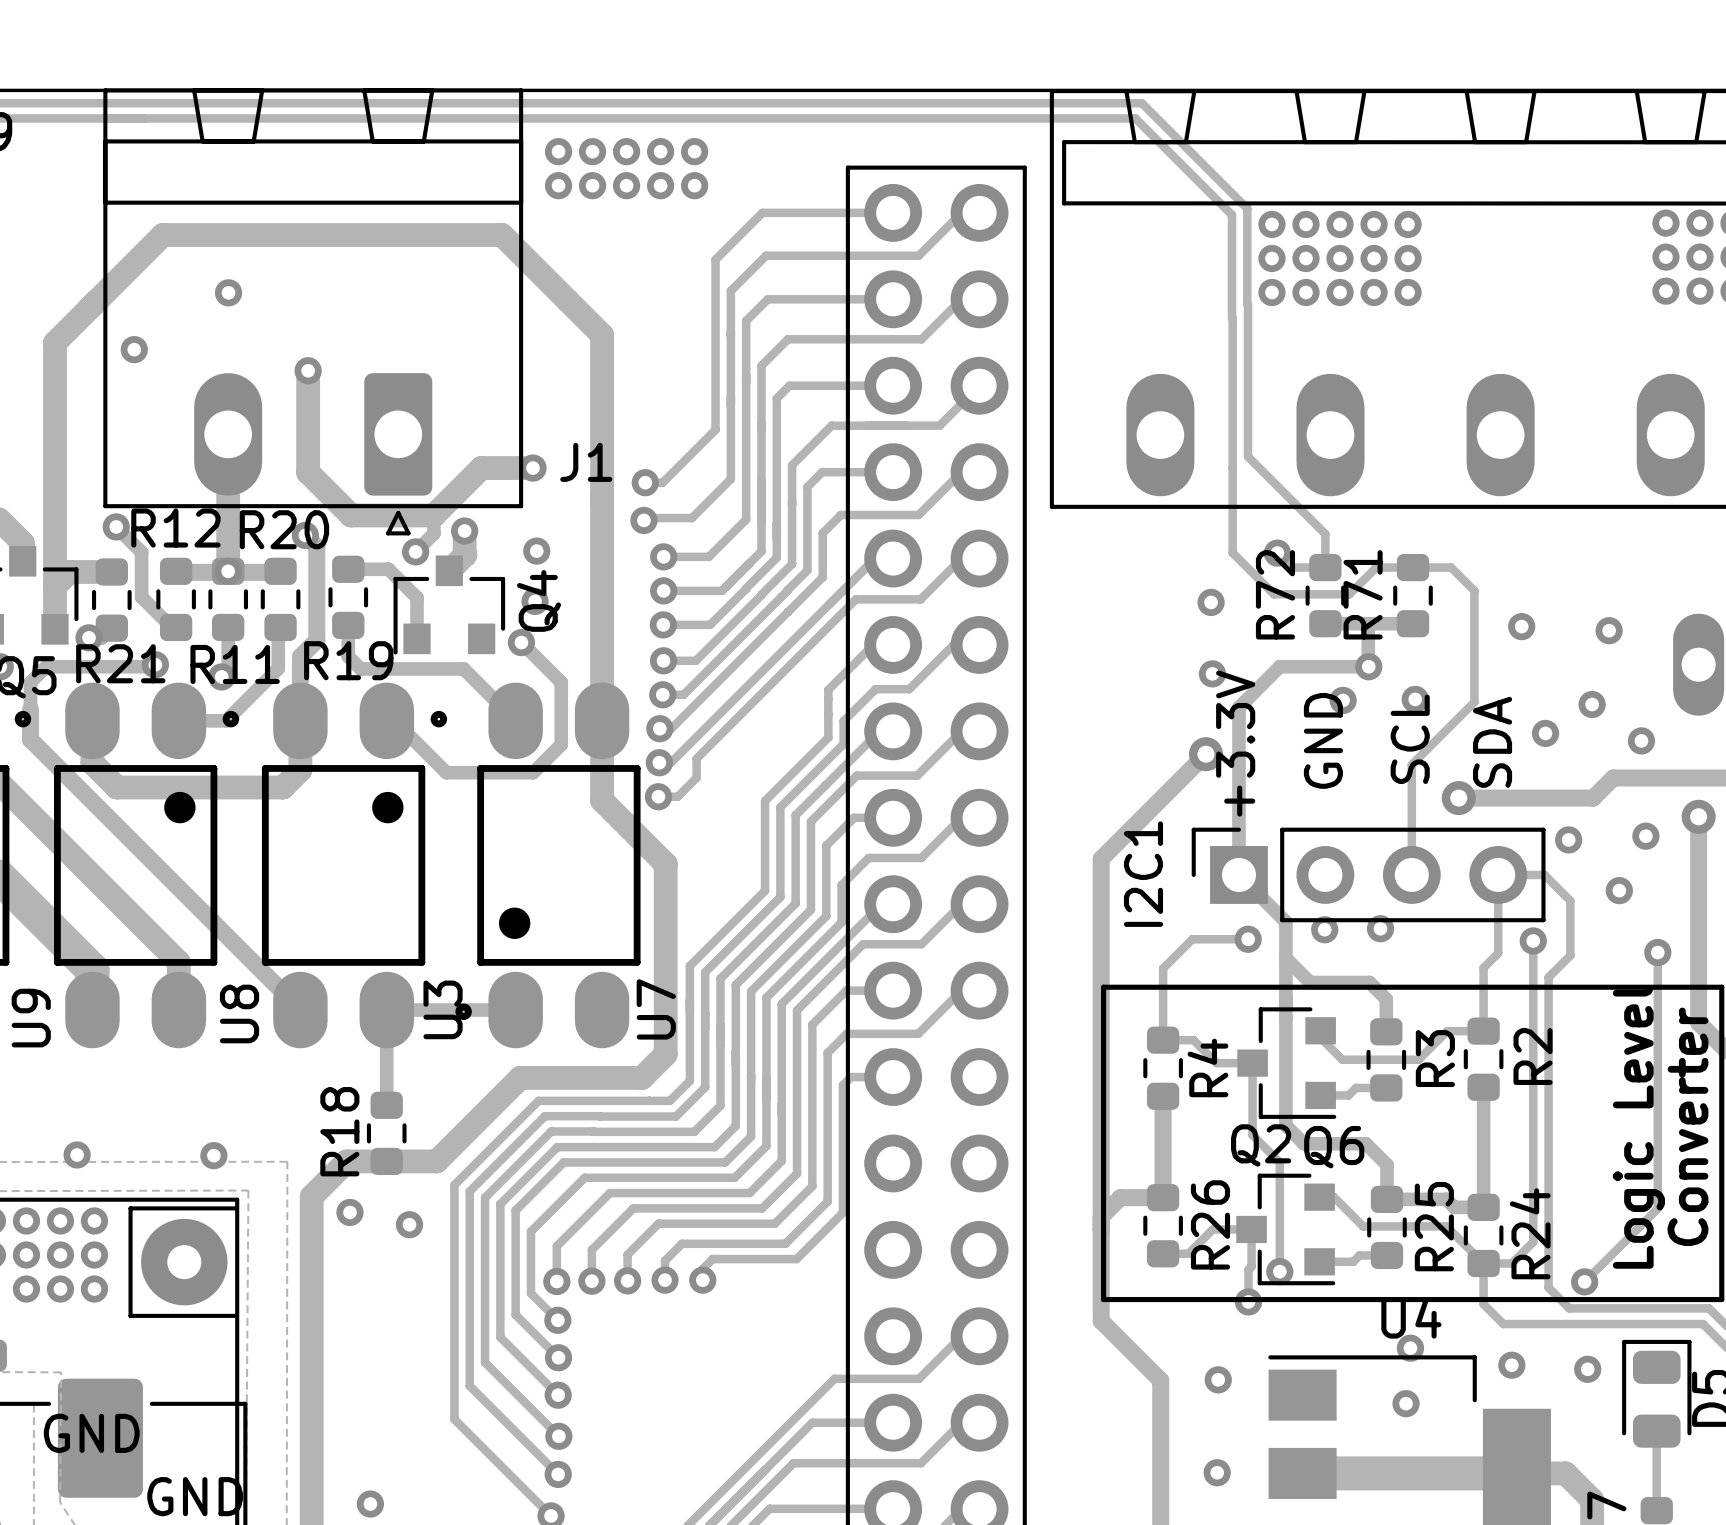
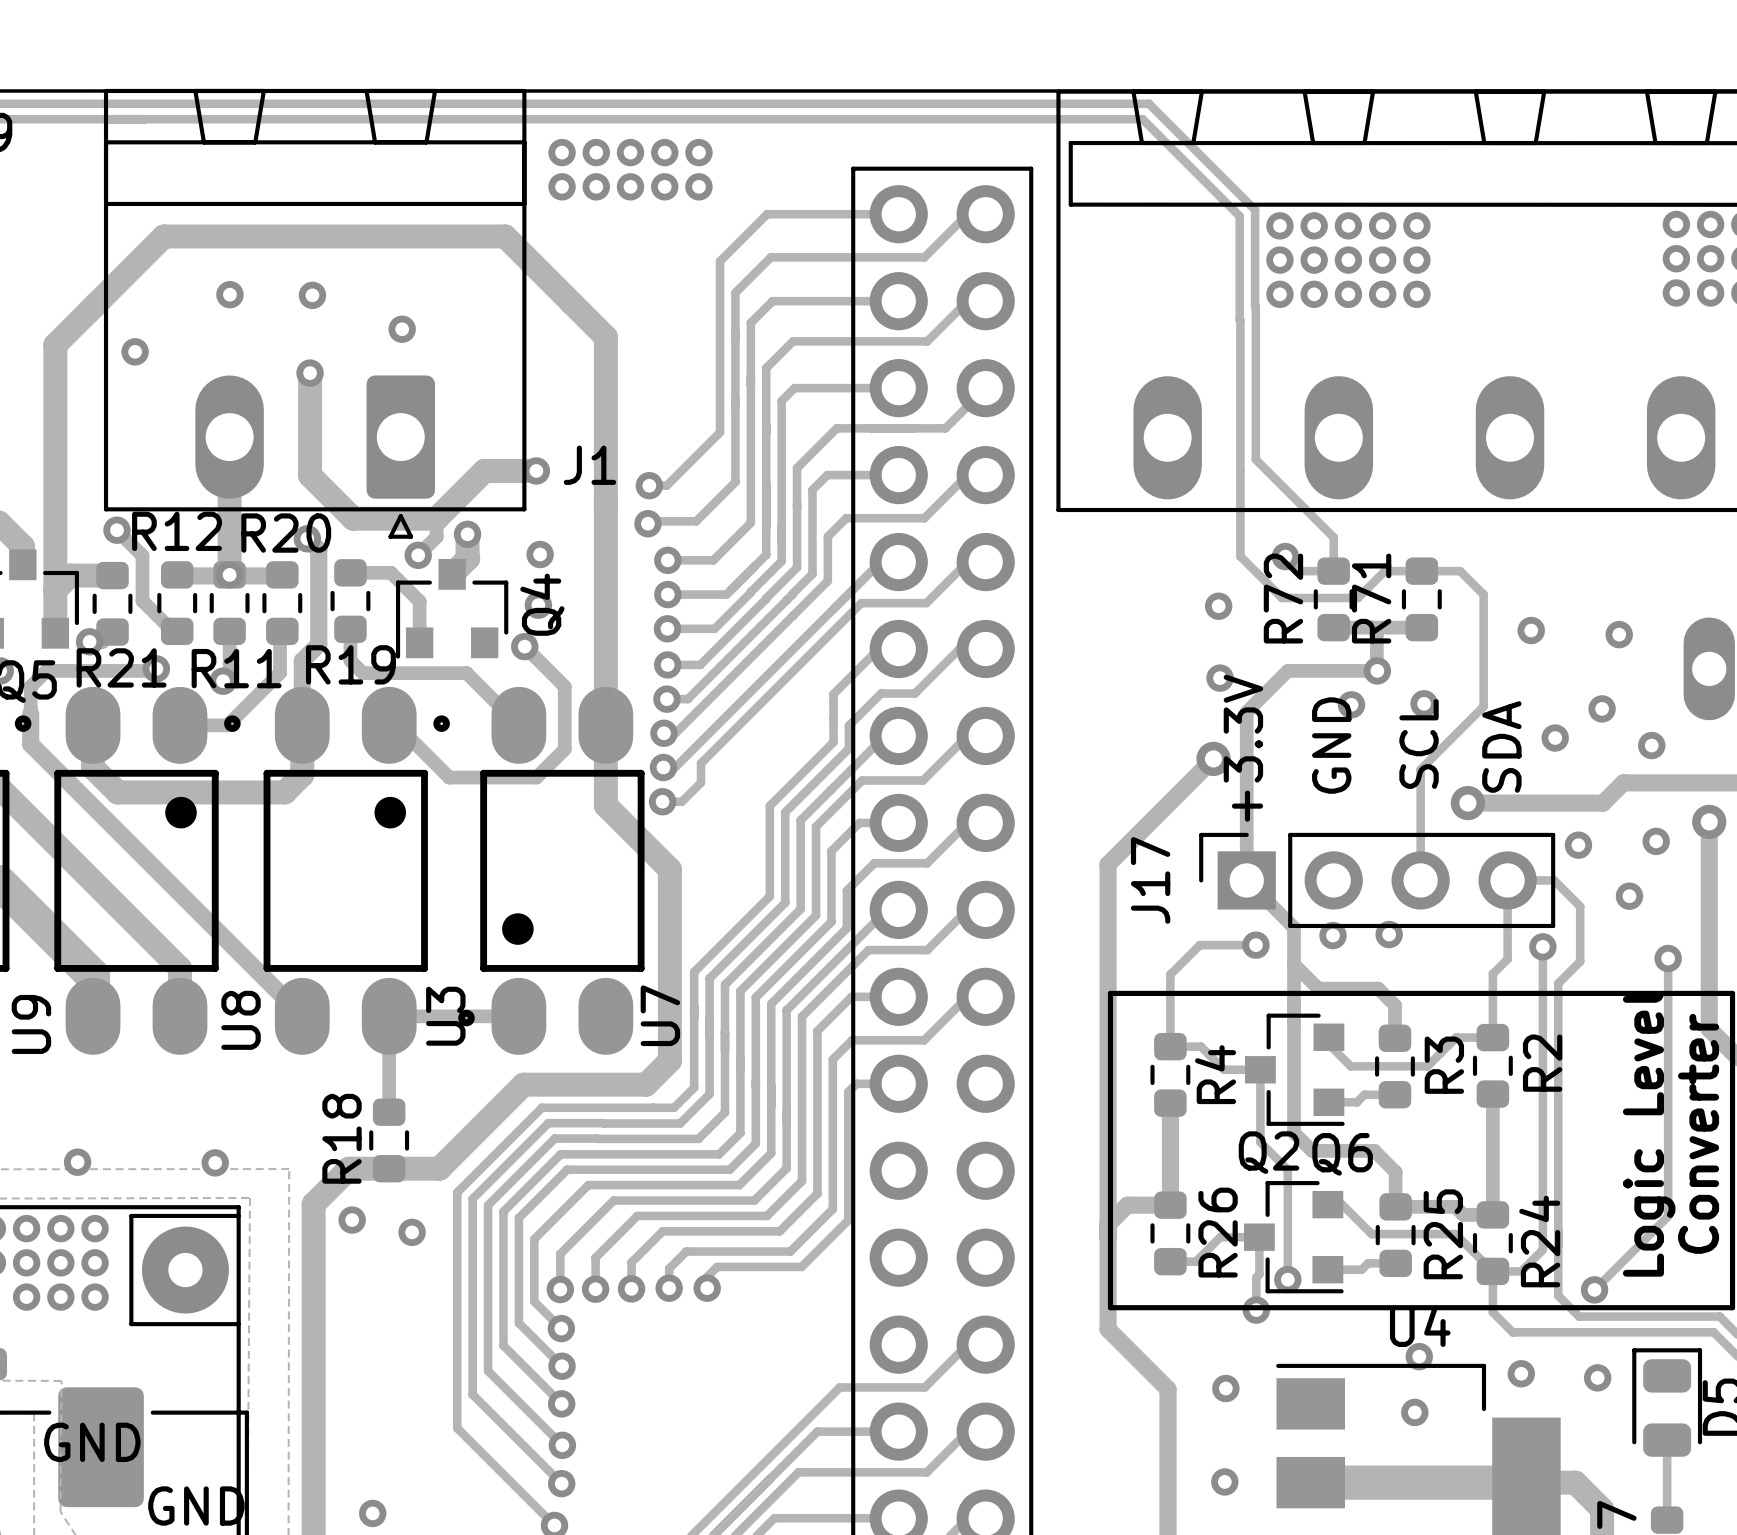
via: none -> (312, 295)
via: none -> (402, 329)
I2C1 name: I2C1 (1143, 874) -> J17 (1150, 880)

